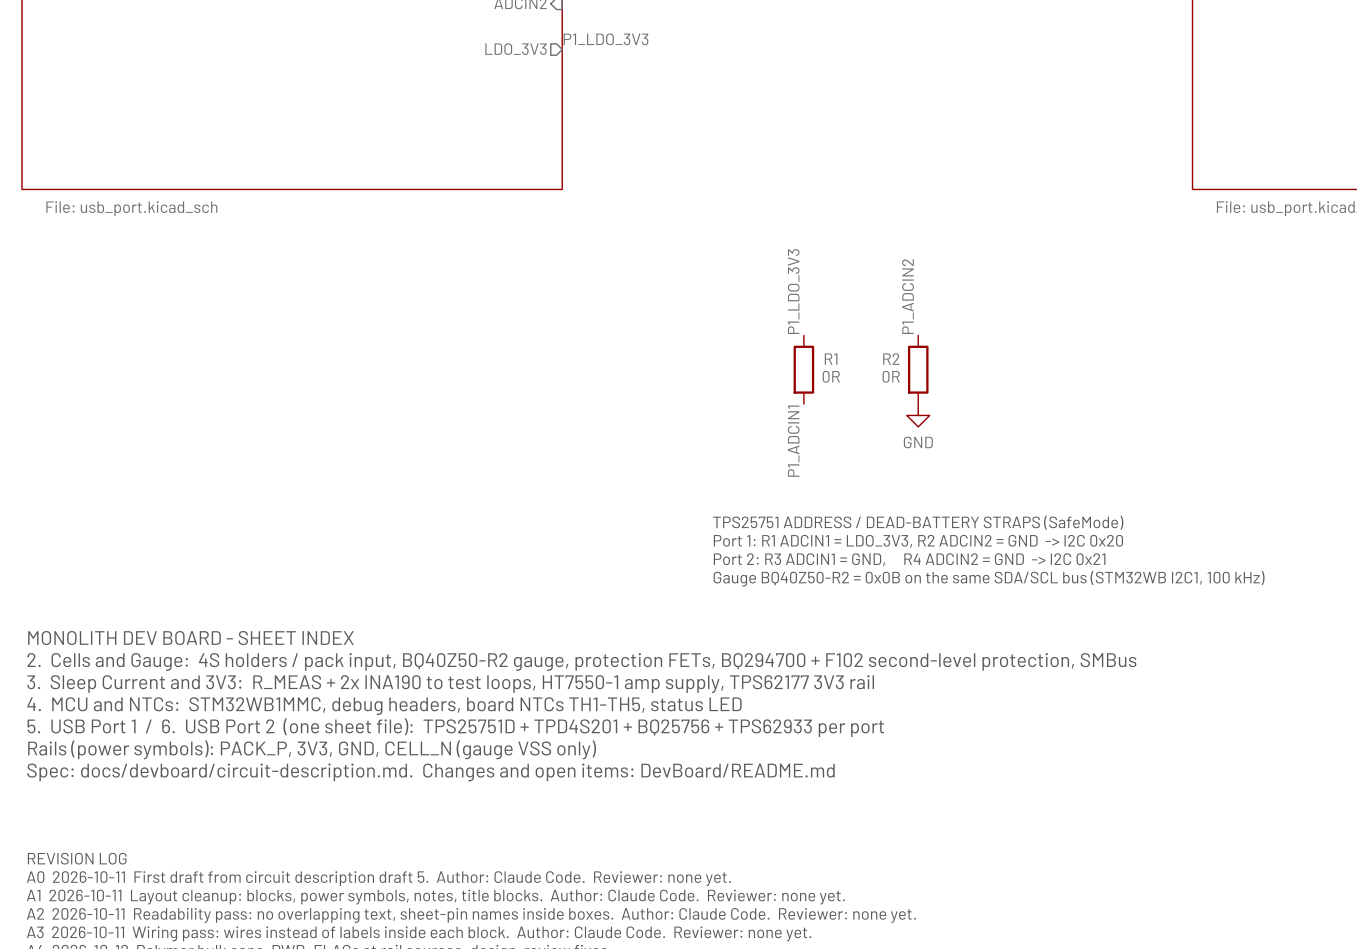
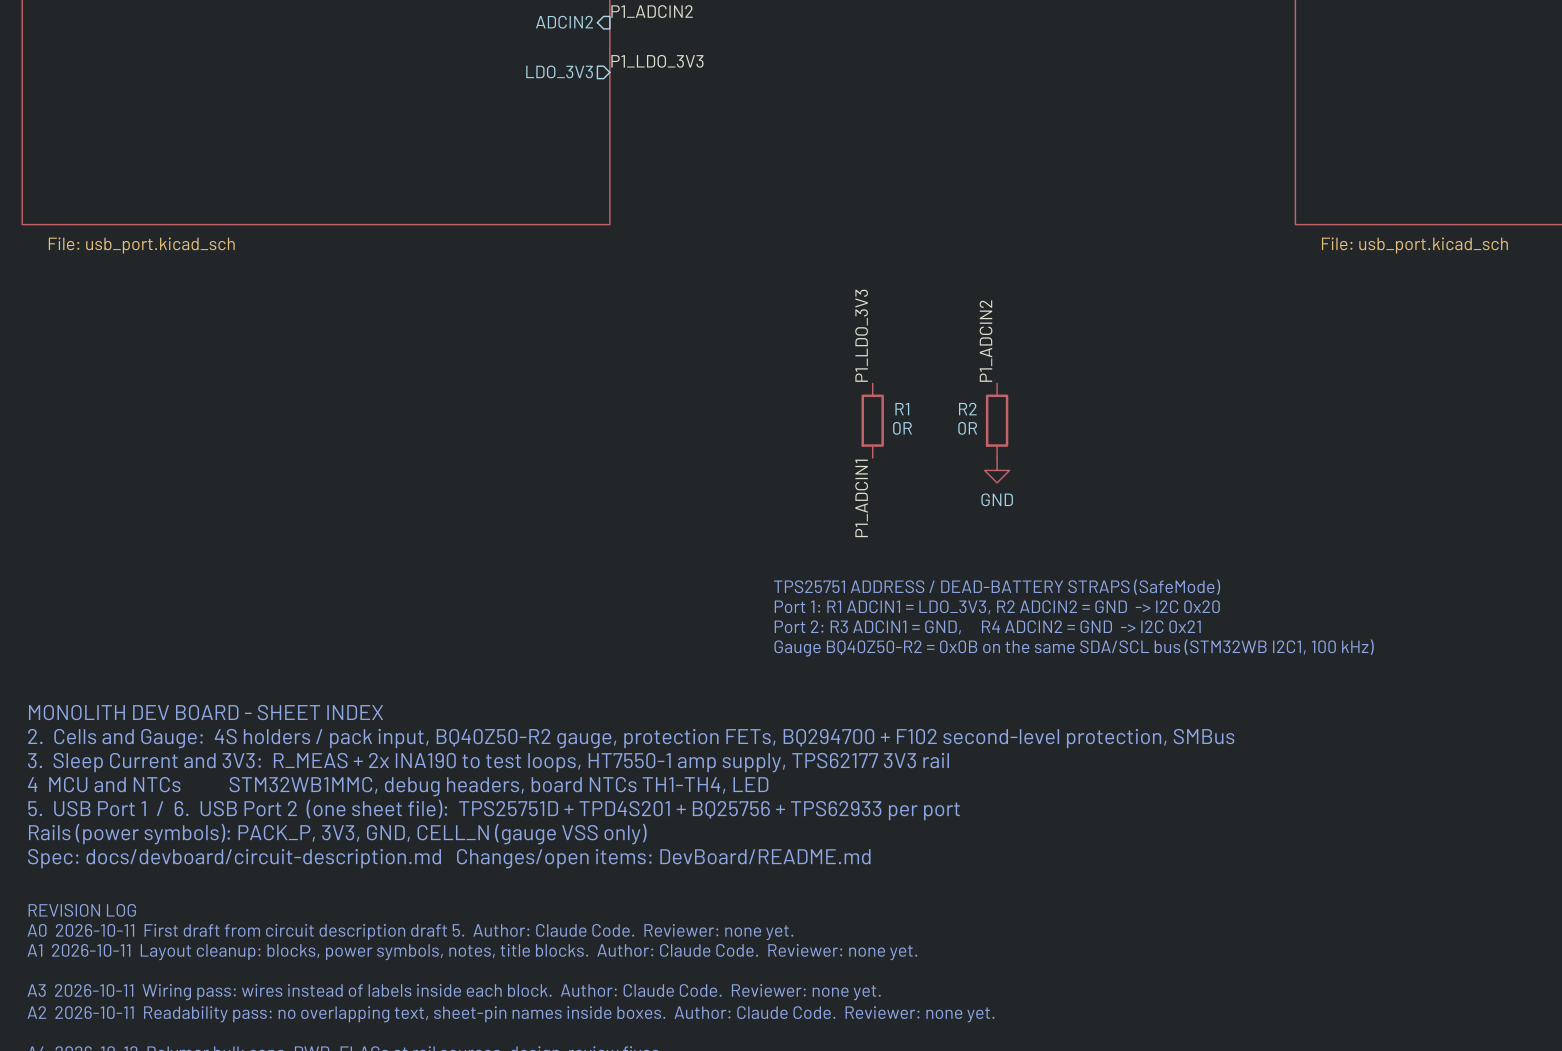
text: 4. MCU and NTCs: STM32WB1MMC, debug headers, board NTCs TH1-TH5, status LED (384, 706) -> 4 MCU and NTCs STM32WB1MMC, debug headers, board NTCs TH1-TH4, LED (398, 786)
text: Spec: docs/devboard/circuit-description.md. Changes and open items: DevBoard/README.md (431, 772) -> Spec: docs/devboard/circuit-description.md Changes/open items: DevBoard/README.md (449, 858)
text position: REVISION LOG (77, 858) -> REVISION LOG (82, 910)
text position: A0 2026-10-11 First draft from circuit description draft 5. Author: Claude Code. Reviewer: none yet. (378, 878) -> A0 2026-10-11 First draft from circuit description draft 5. Author: Claude Code. Reviewer: none yet. (410, 932)
text position: A1 2026-10-11 Layout cleanup: blocks, power symbols, notes, title blocks. Author: Claude Code. Reviewer: none yet. (435, 897) -> A1 2026-10-11 Layout cleanup: blocks, power symbols, notes, title blocks. Author: Claude Code. Reviewer: none yet. (472, 952)
text position: A3 2026-10-11 Wiring pass: wires instead of labels inside each block. Author: Claude Code. Reviewer: none yet. (419, 933) -> A3 2026-10-11 Wiring pass: wires instead of labels inside each block. Author: Claude Code. Reviewer: none yet. (454, 992)

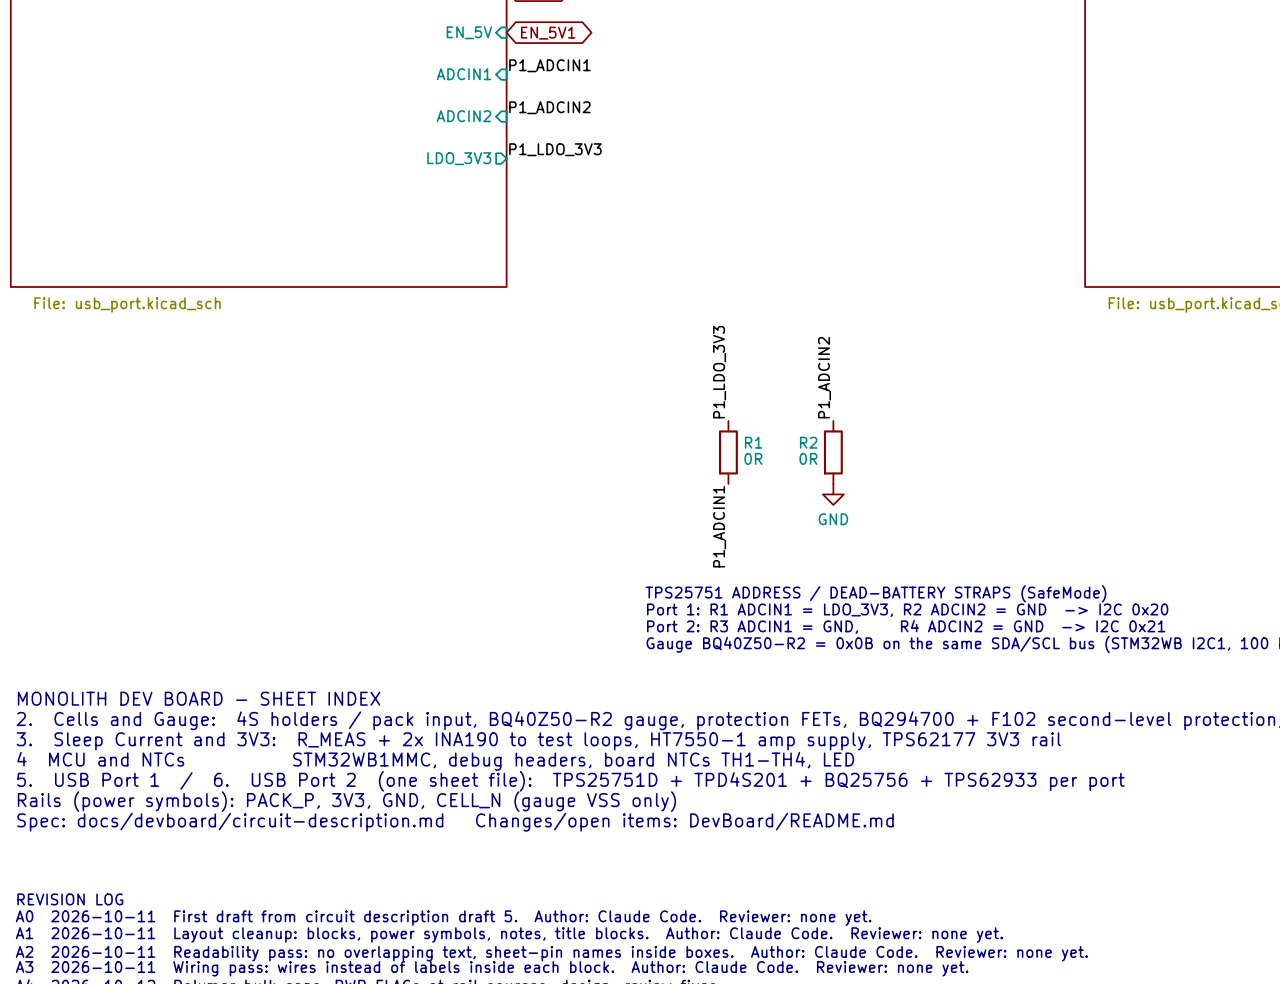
text: REVISION LOG (82, 910) -> none
text position: A0 2026-10-11 First draft from circuit description draft 5. Author: Claude Code. Reviewer: none yet. (410, 932) -> A0 2026-10-11 First draft from circuit description draft 5. Author: Claude Code. Reviewer: none yet. (443, 918)
text: A1 2026-10-11 Layout cleanup: blocks, power symbols, notes, title blocks. Author: Claude Code. Reviewer: none yet. (472, 952) -> REVISION LOG (70, 899)
text: A3 2026-10-11 Wiring pass: wires instead of labels inside each block. Author: Claude Code. Reviewer: none yet. (454, 992) -> A1 2026-10-11 Layout cleanup: blocks, power symbols, notes, title blocks. Author: Claude Code. Reviewer: none yet. (509, 934)
text: none -> A3 2026-10-11 Wiring pass: wires instead of labels inside each block. Author: Claude Code. Reviewer: none yet. (492, 968)

